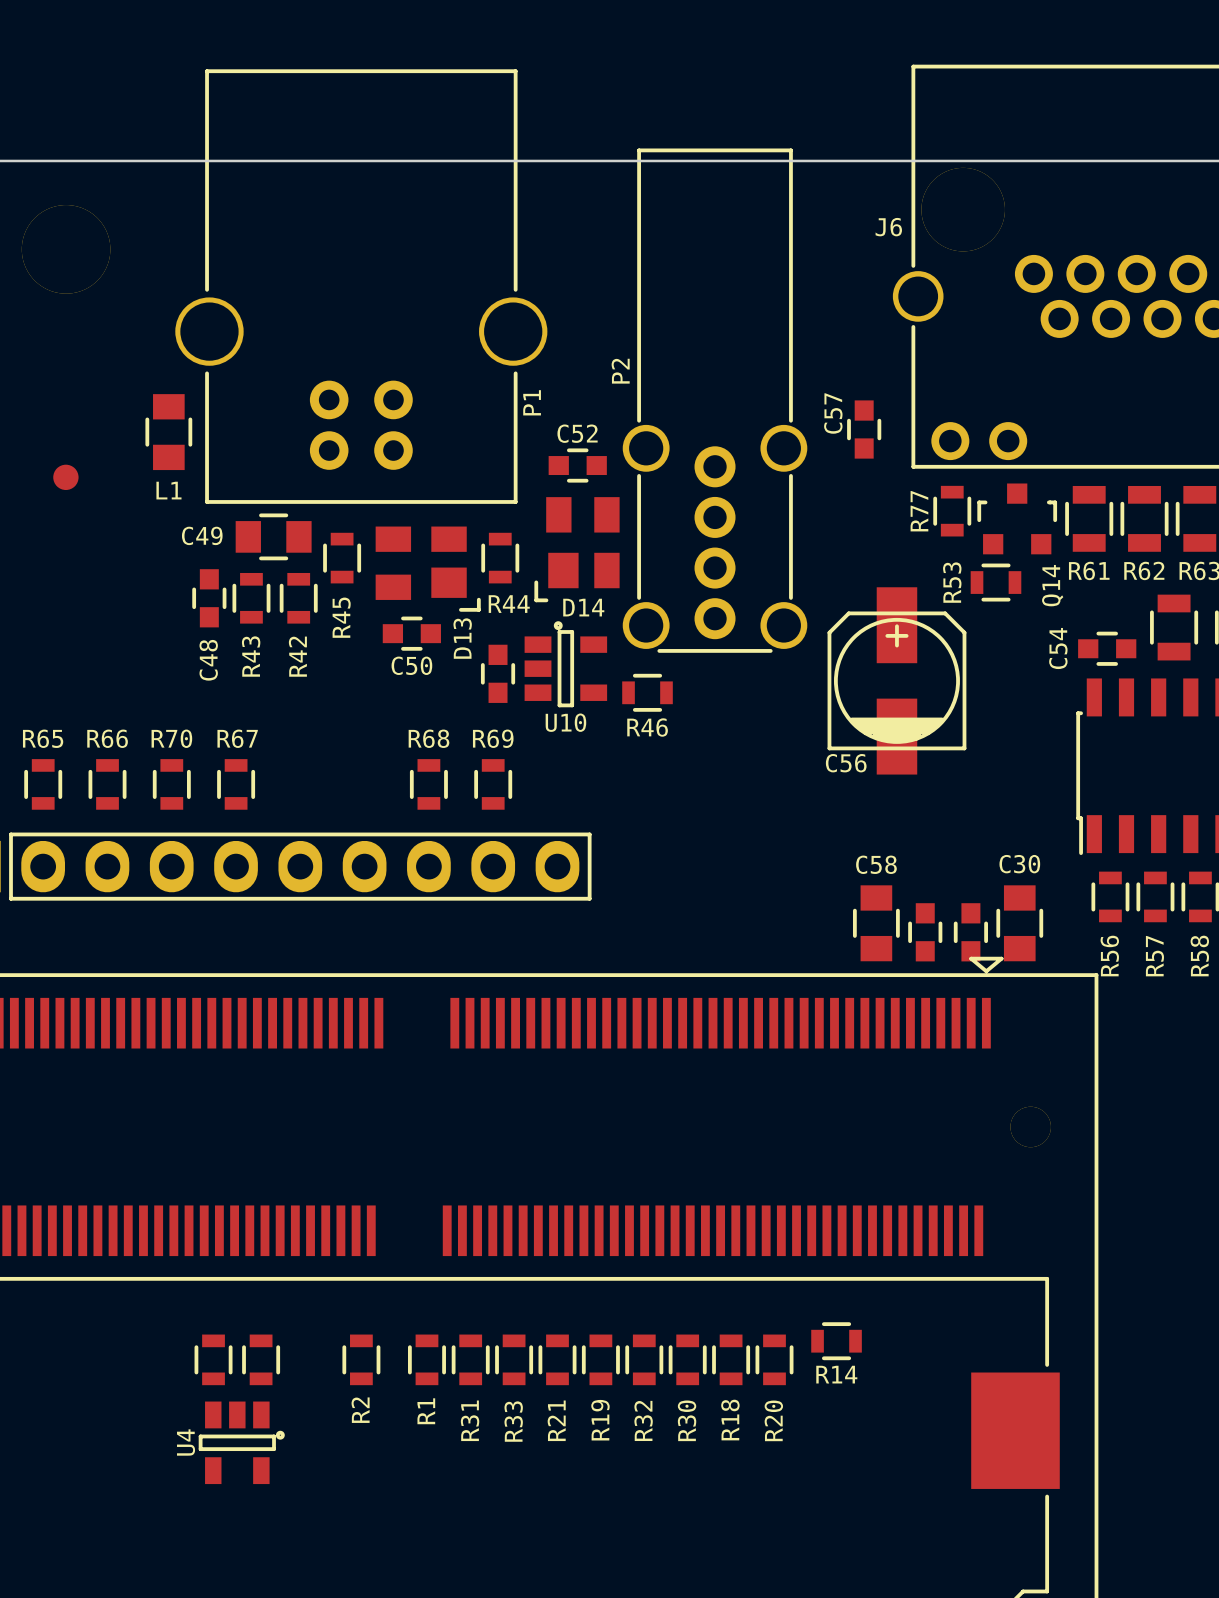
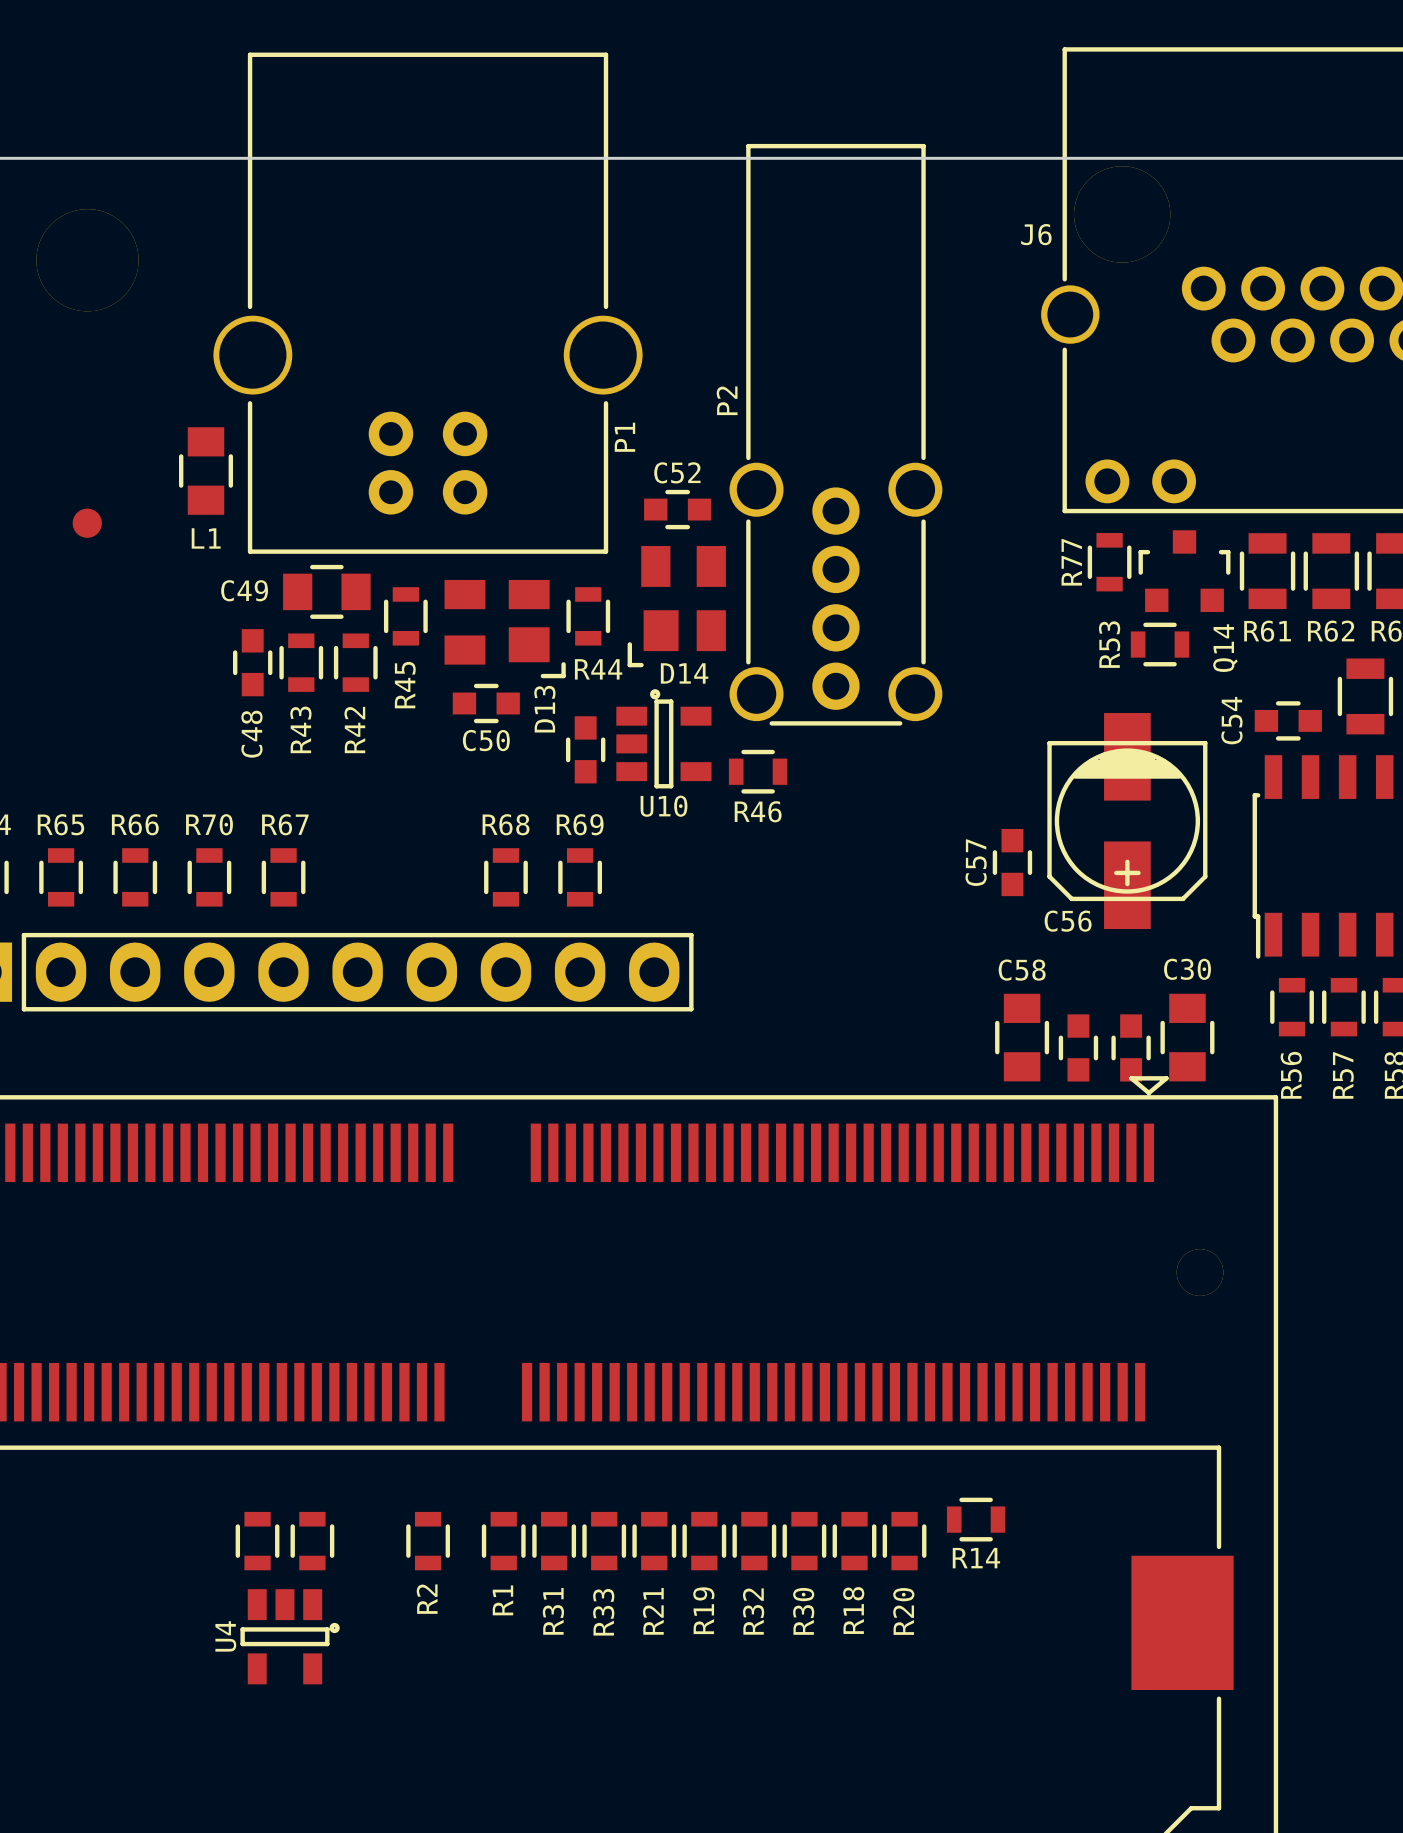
C57 name position: C57 (833, 413) -> C57 (976, 862)
C57 position: (864, 429) -> (1012, 862)
C56 rotation: 0° (896, 680) -> 180° (1127, 821)

